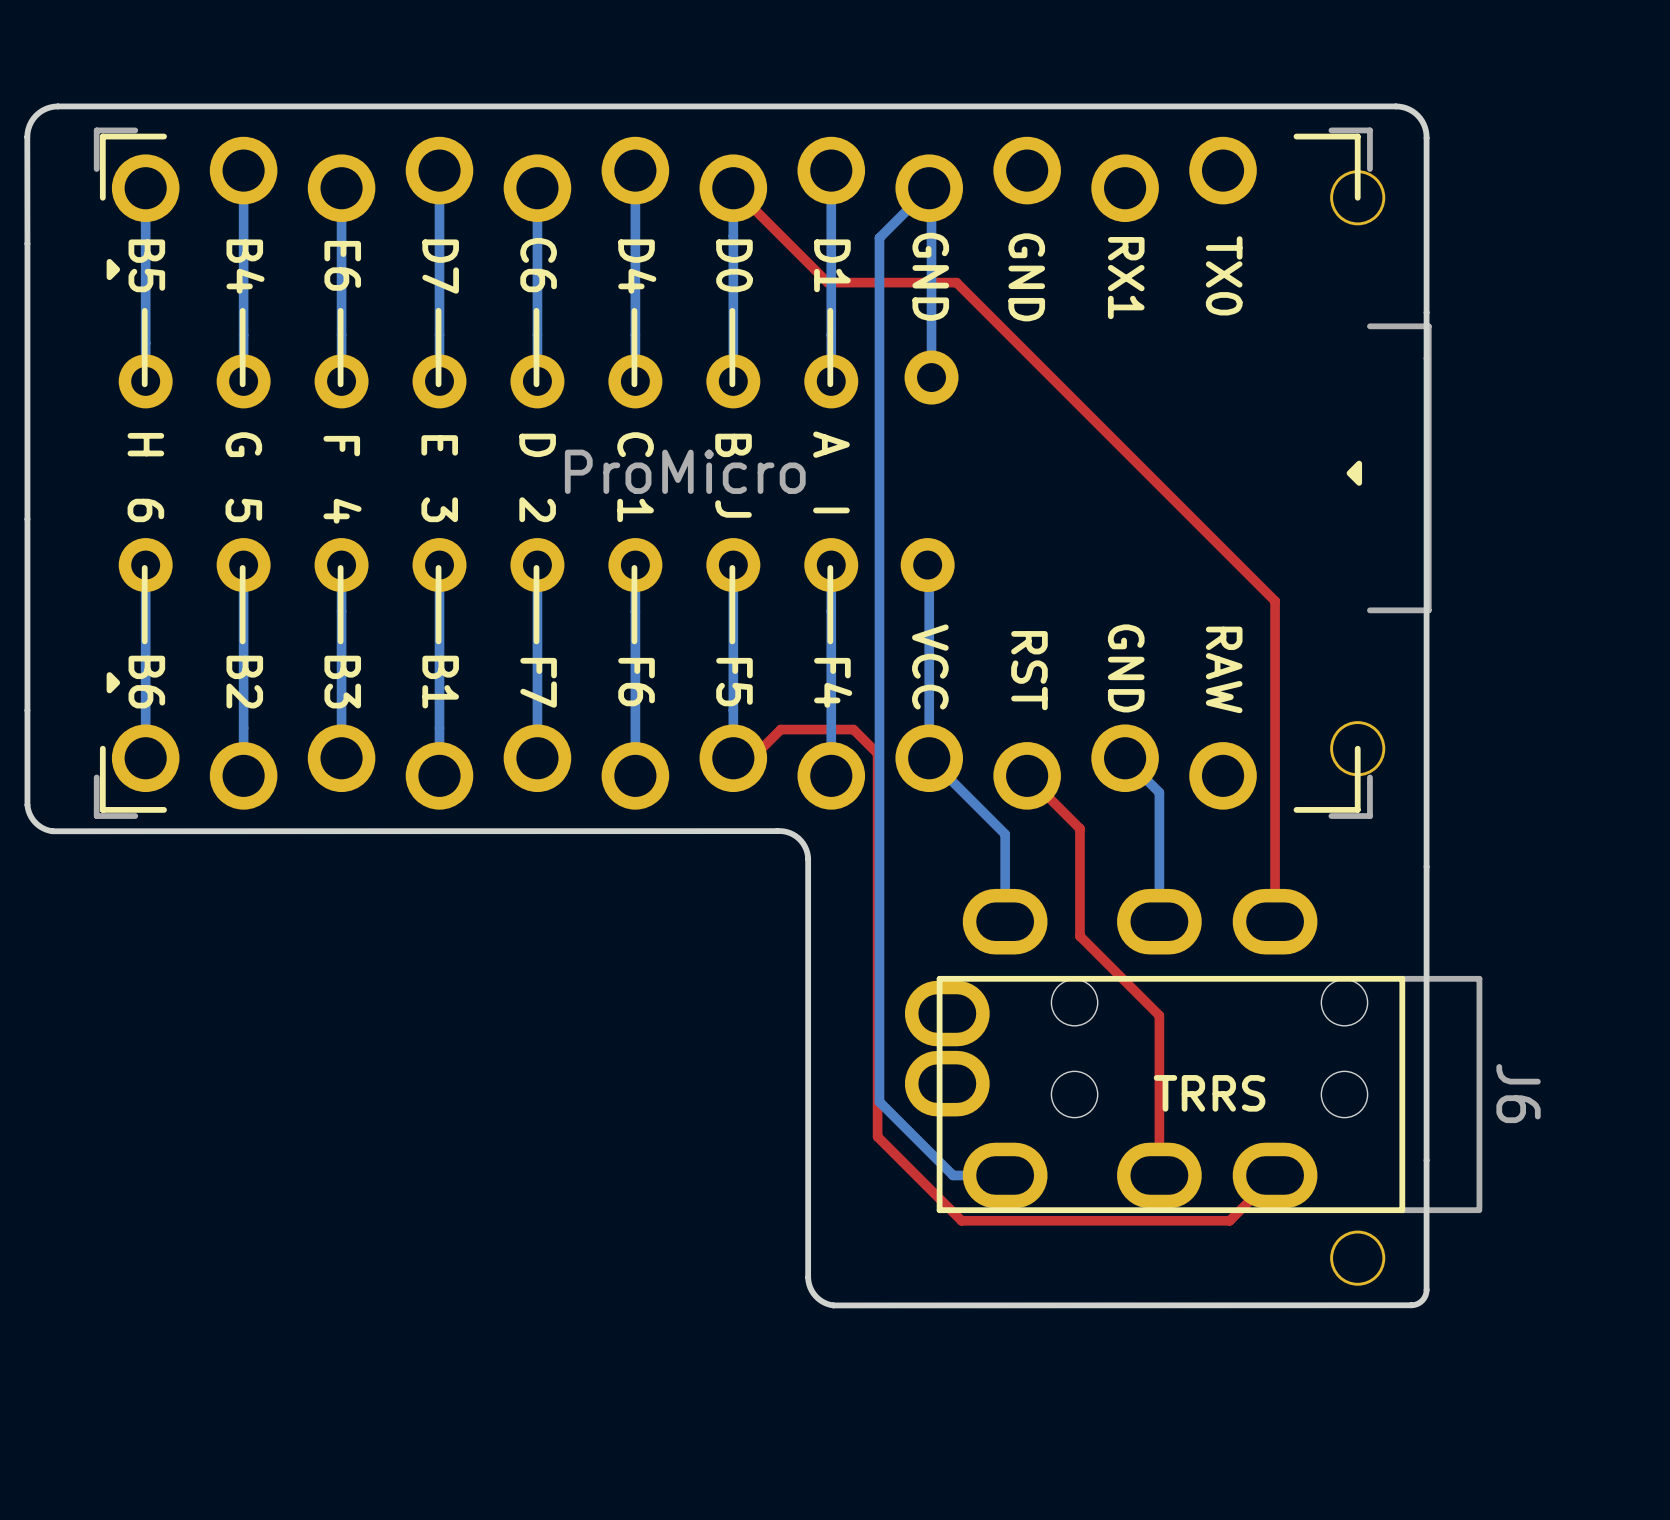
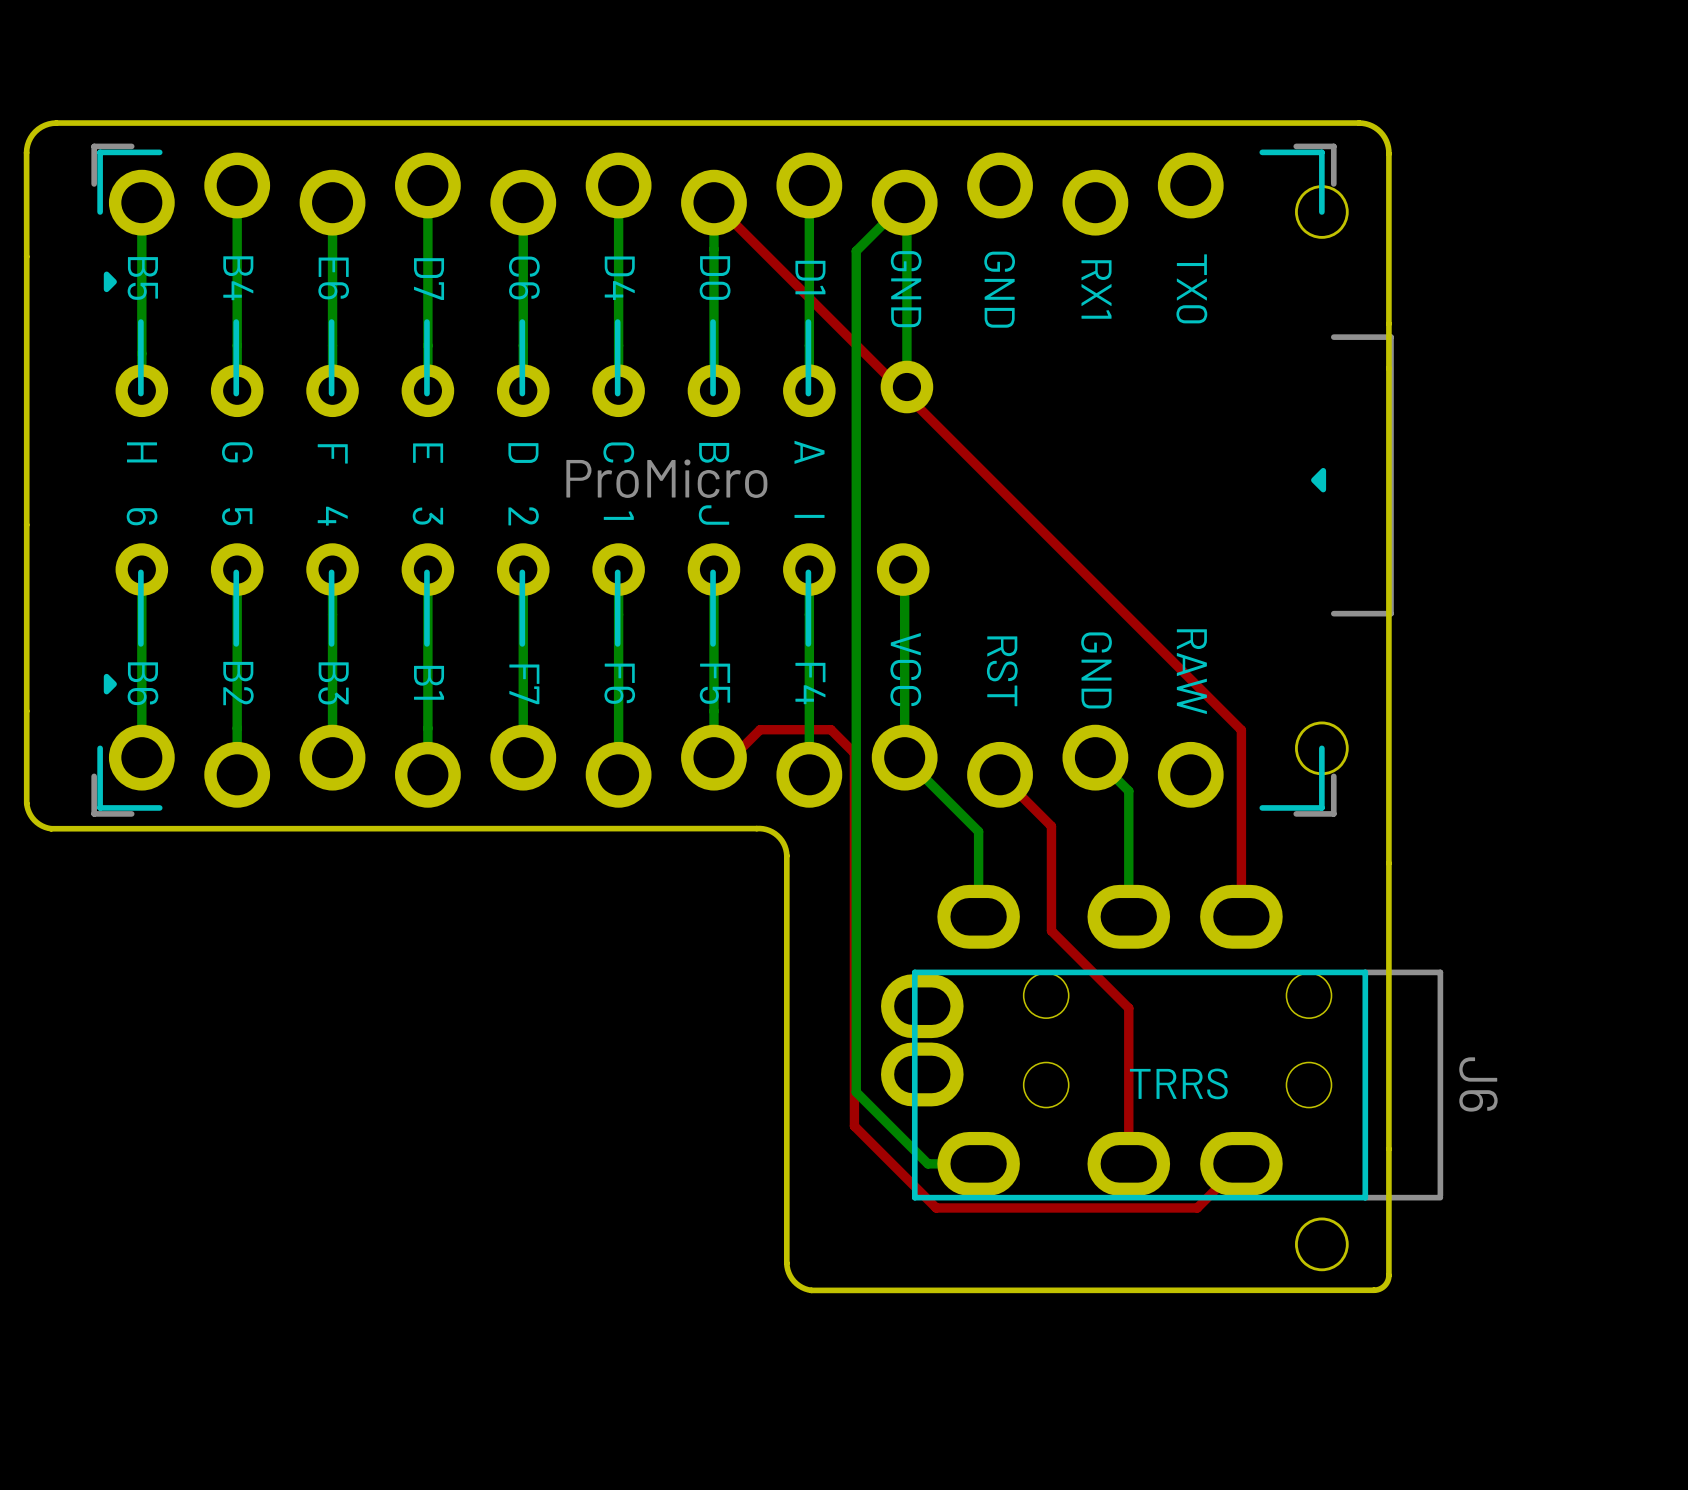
top track: (827, 282) (956, 282) (1275, 601) (1275, 729) -> (805, 294) (1241, 730)

